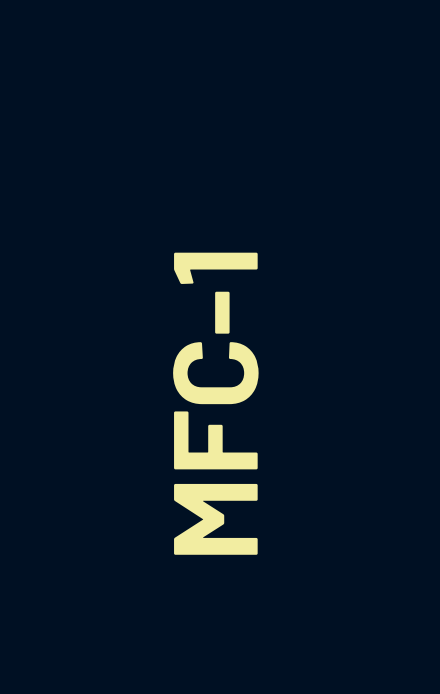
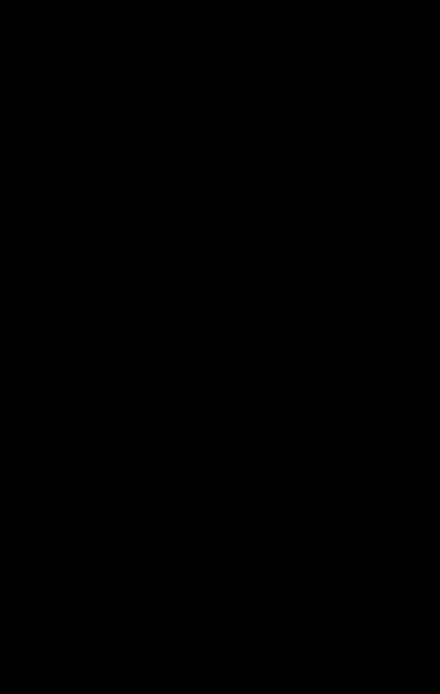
text: MFC-1 (215, 403) -> none

